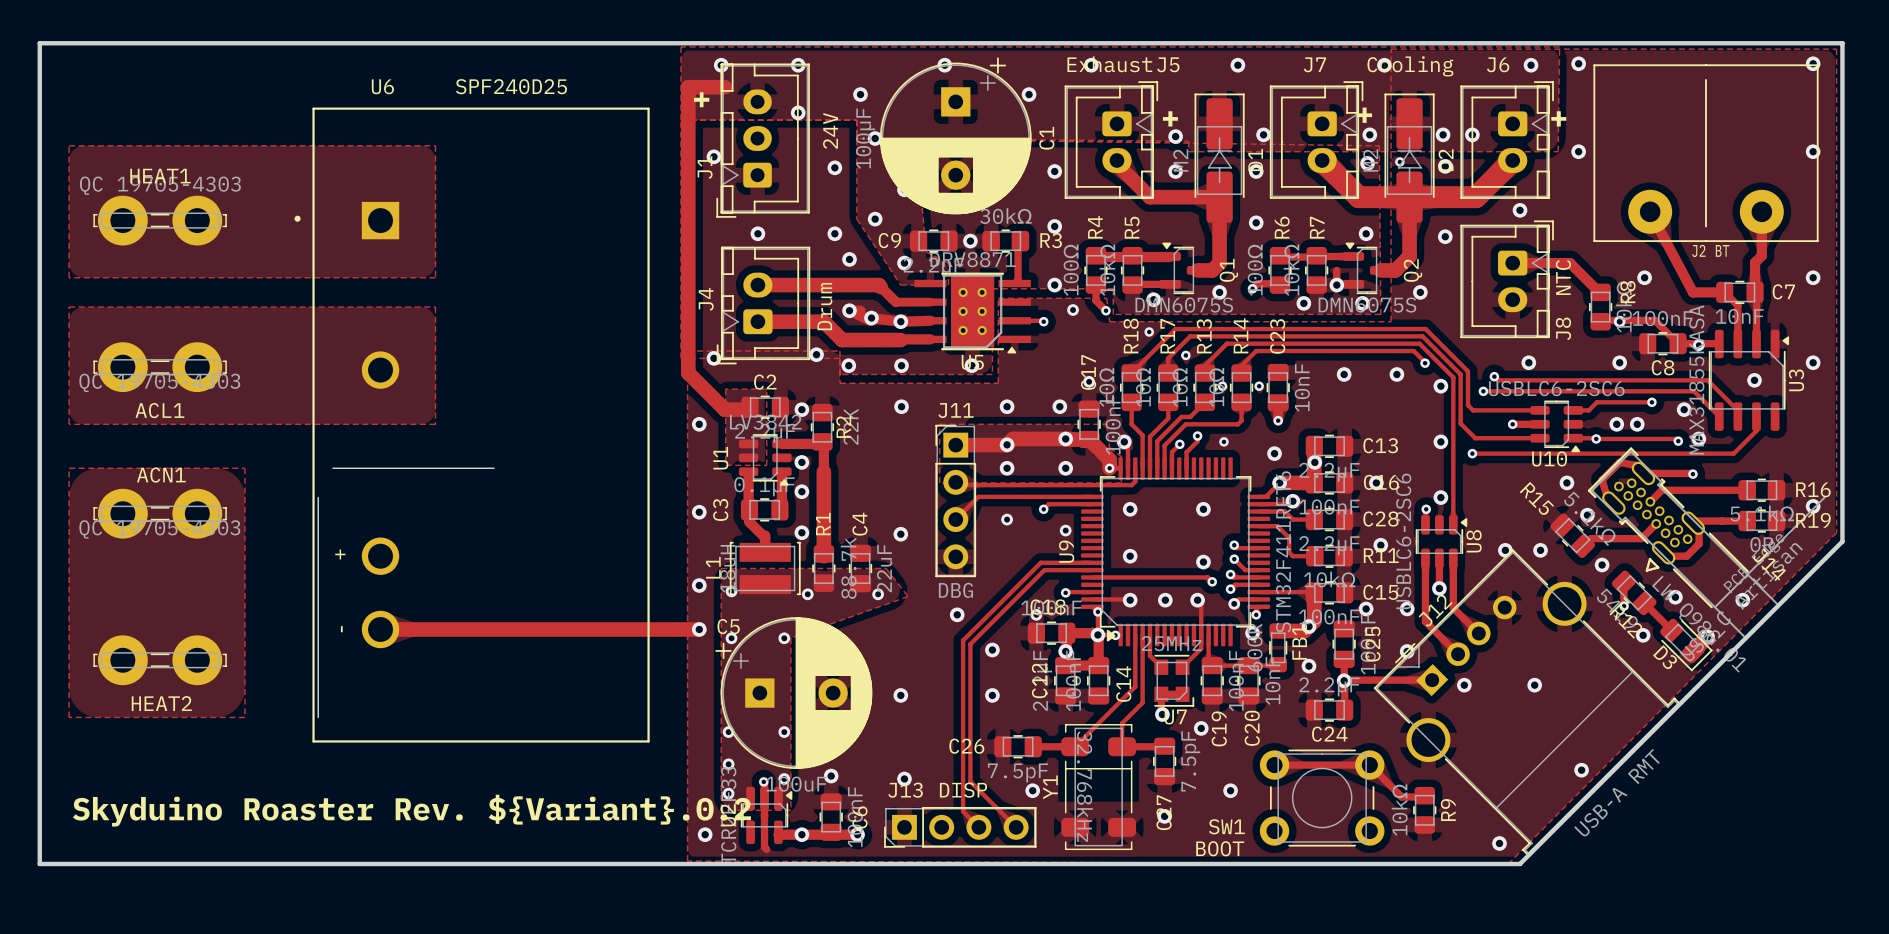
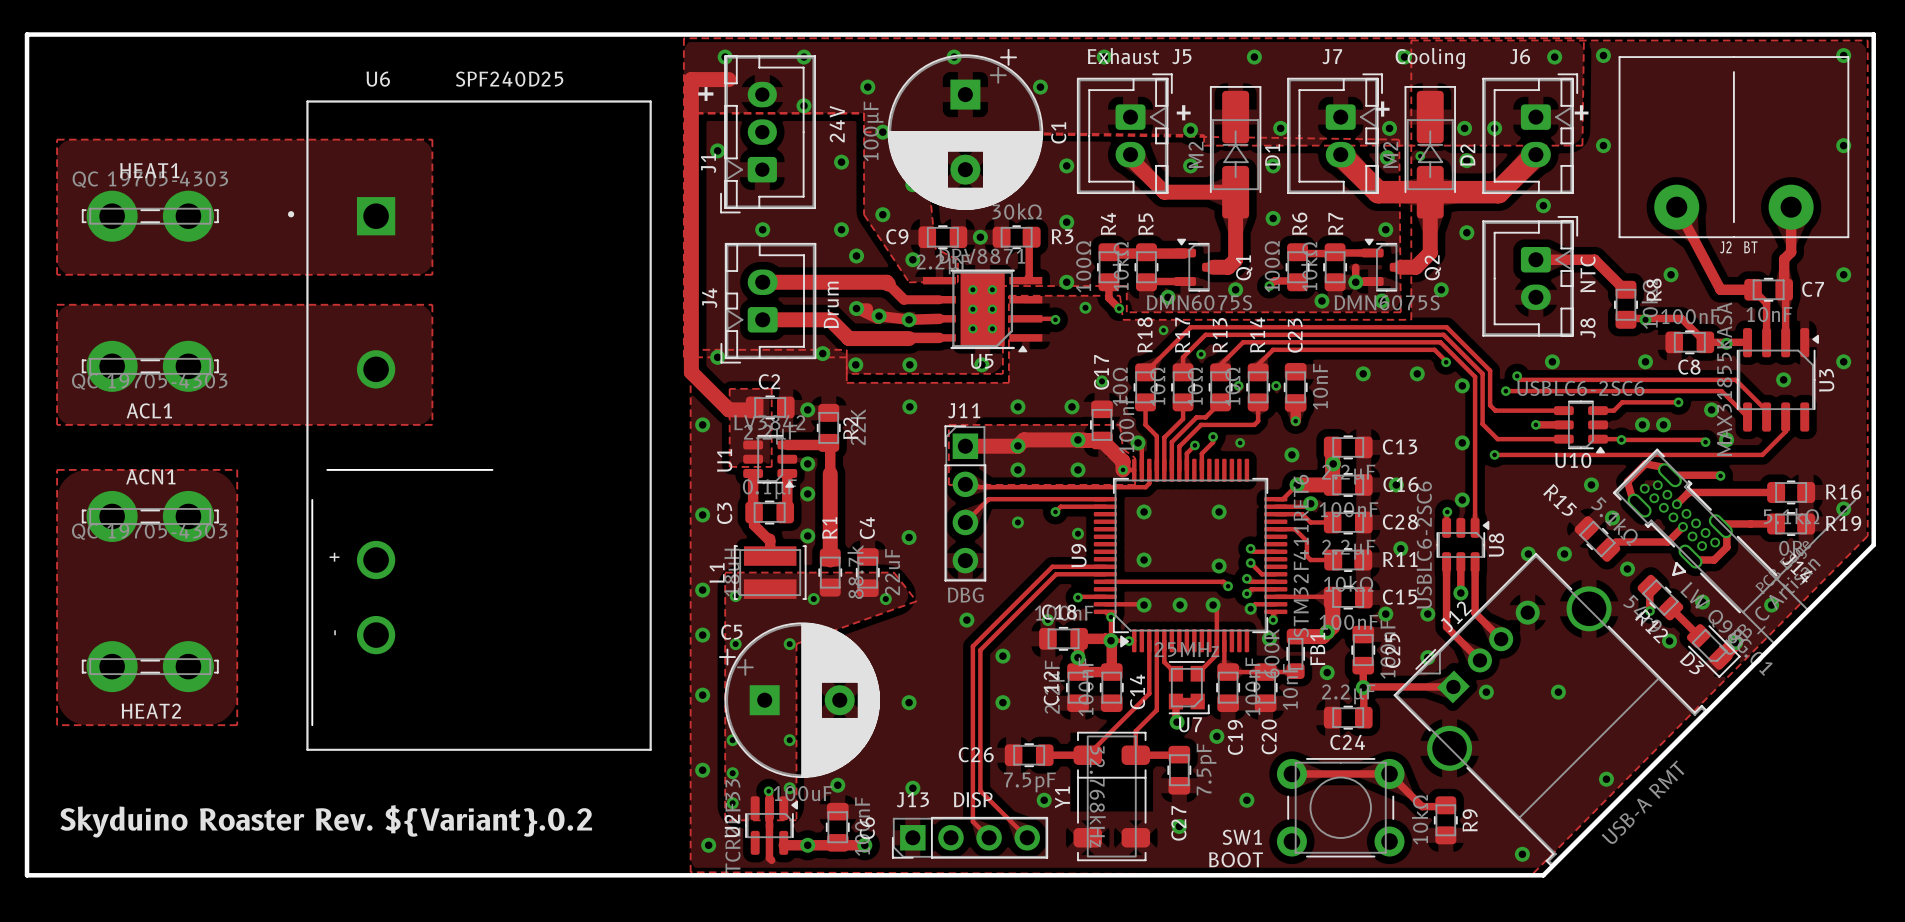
track: (380, 629) (699, 629) -> none
via: none -> (702, 695)
via: none -> (702, 770)

